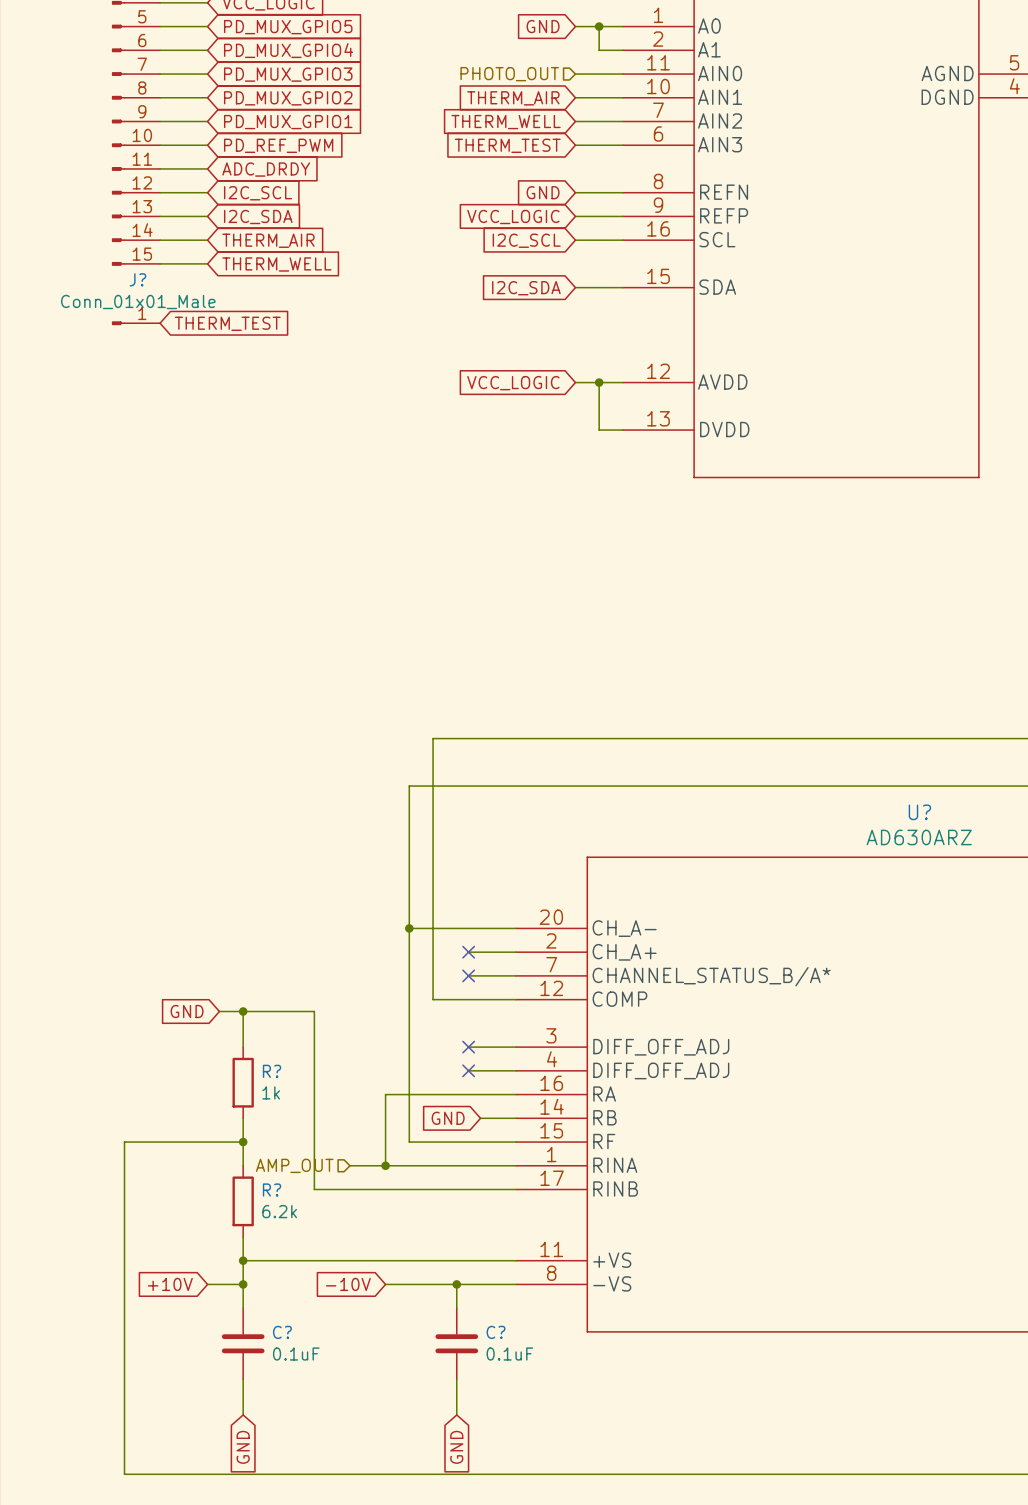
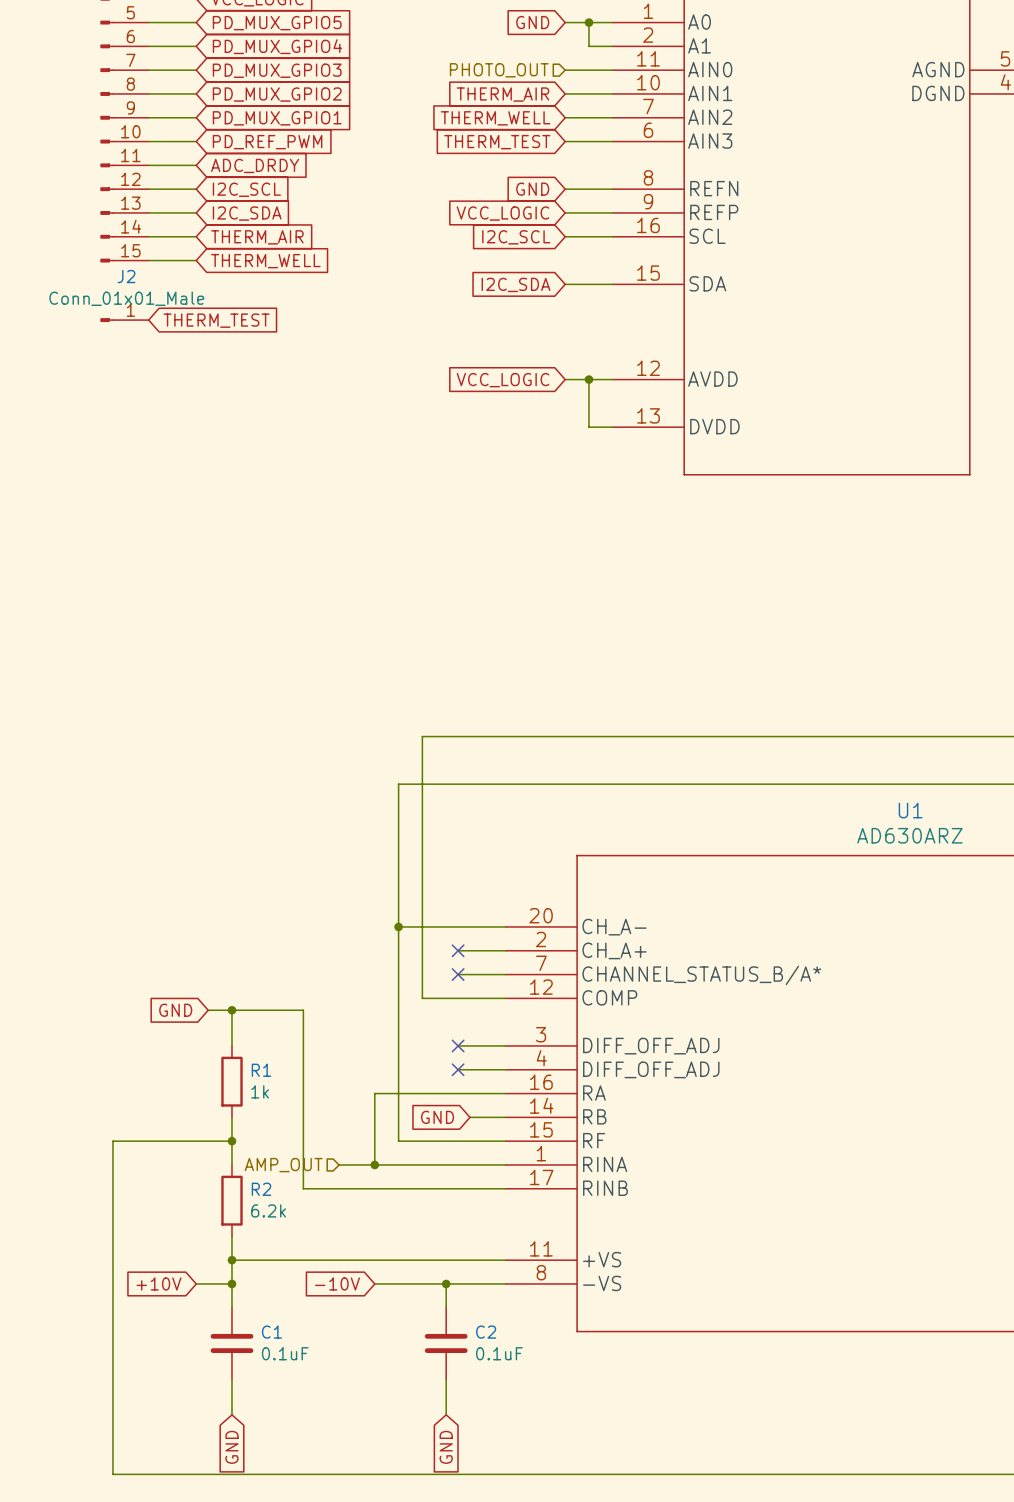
J? name: J? (137, 279) -> J2 (126, 276)
U? name: U? (919, 812) -> U1 (910, 810)
R? name: R? (272, 1071) -> R1 (261, 1070)
R? name: R? (272, 1190) -> R2 (261, 1189)
C? name: C? (282, 1332) -> C1 (271, 1332)
C? name: C? (496, 1332) -> C2 (486, 1332)

